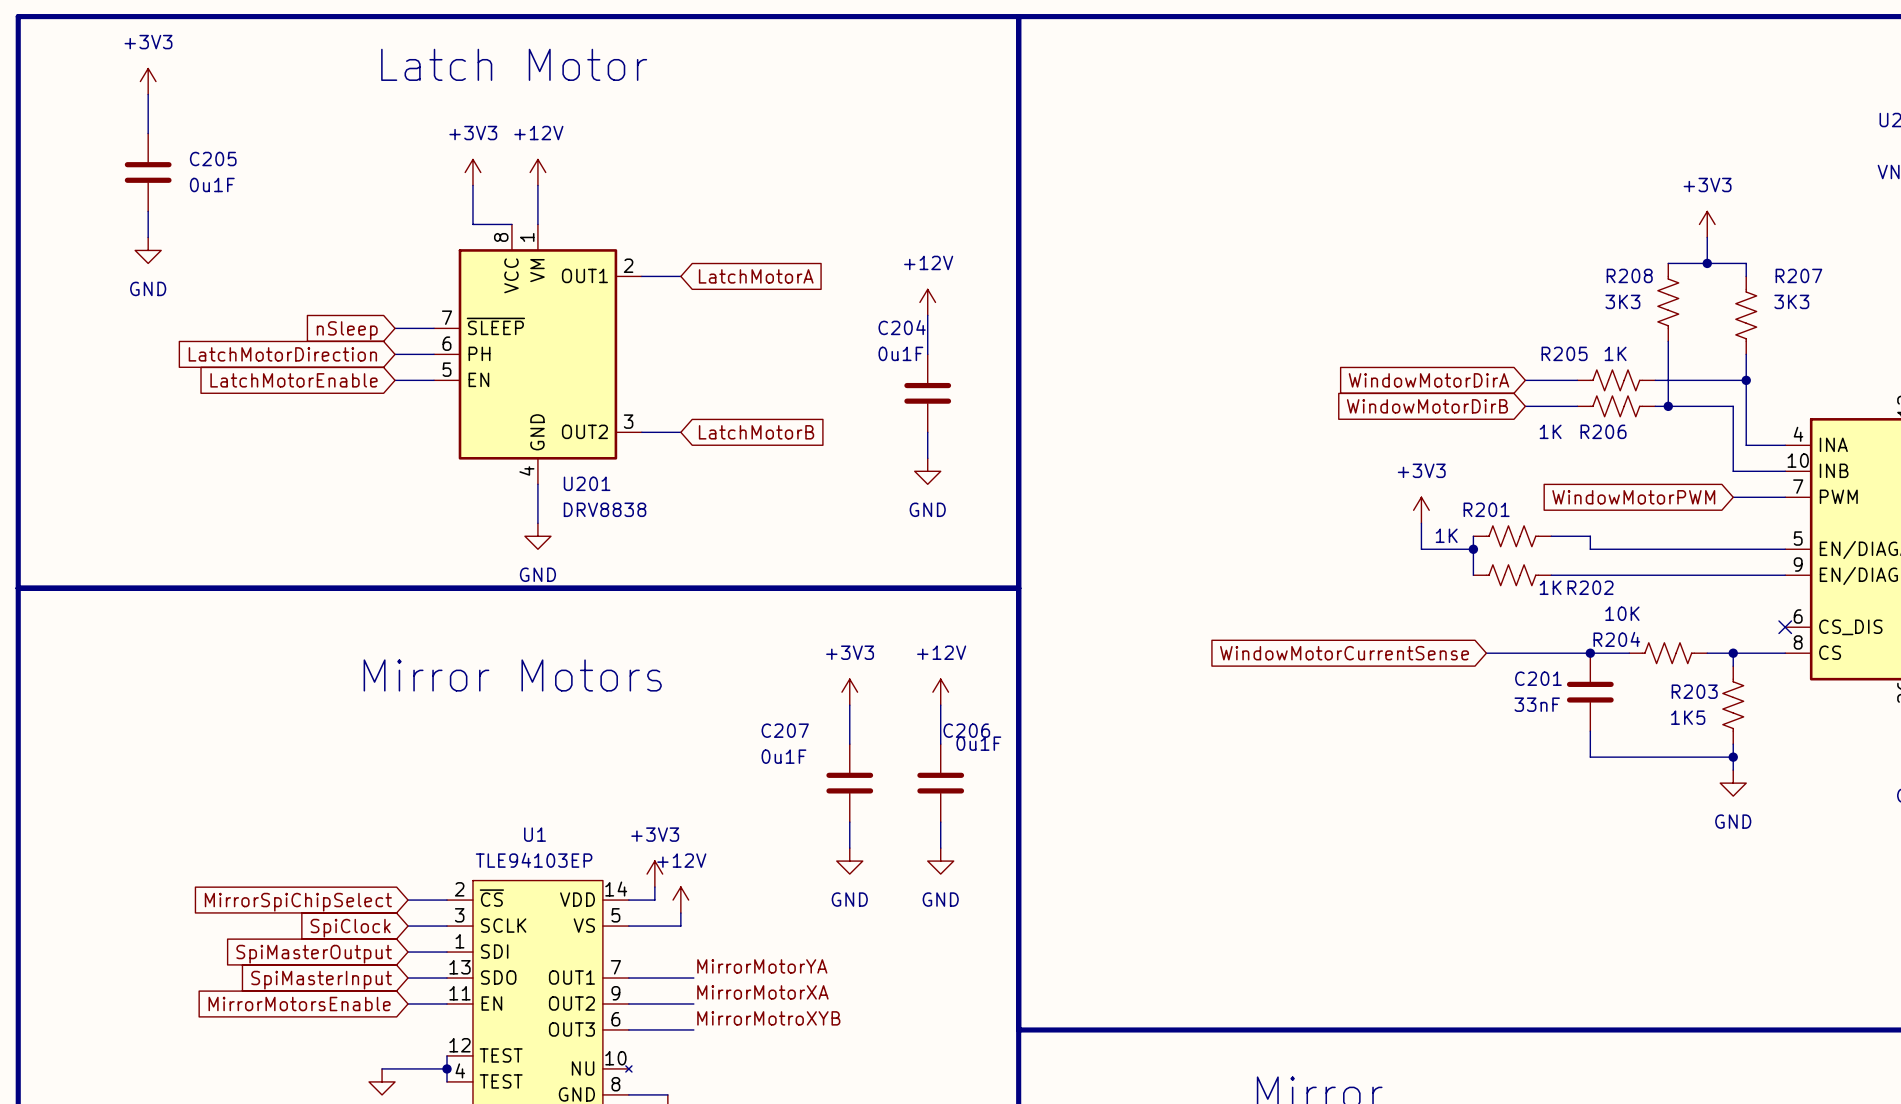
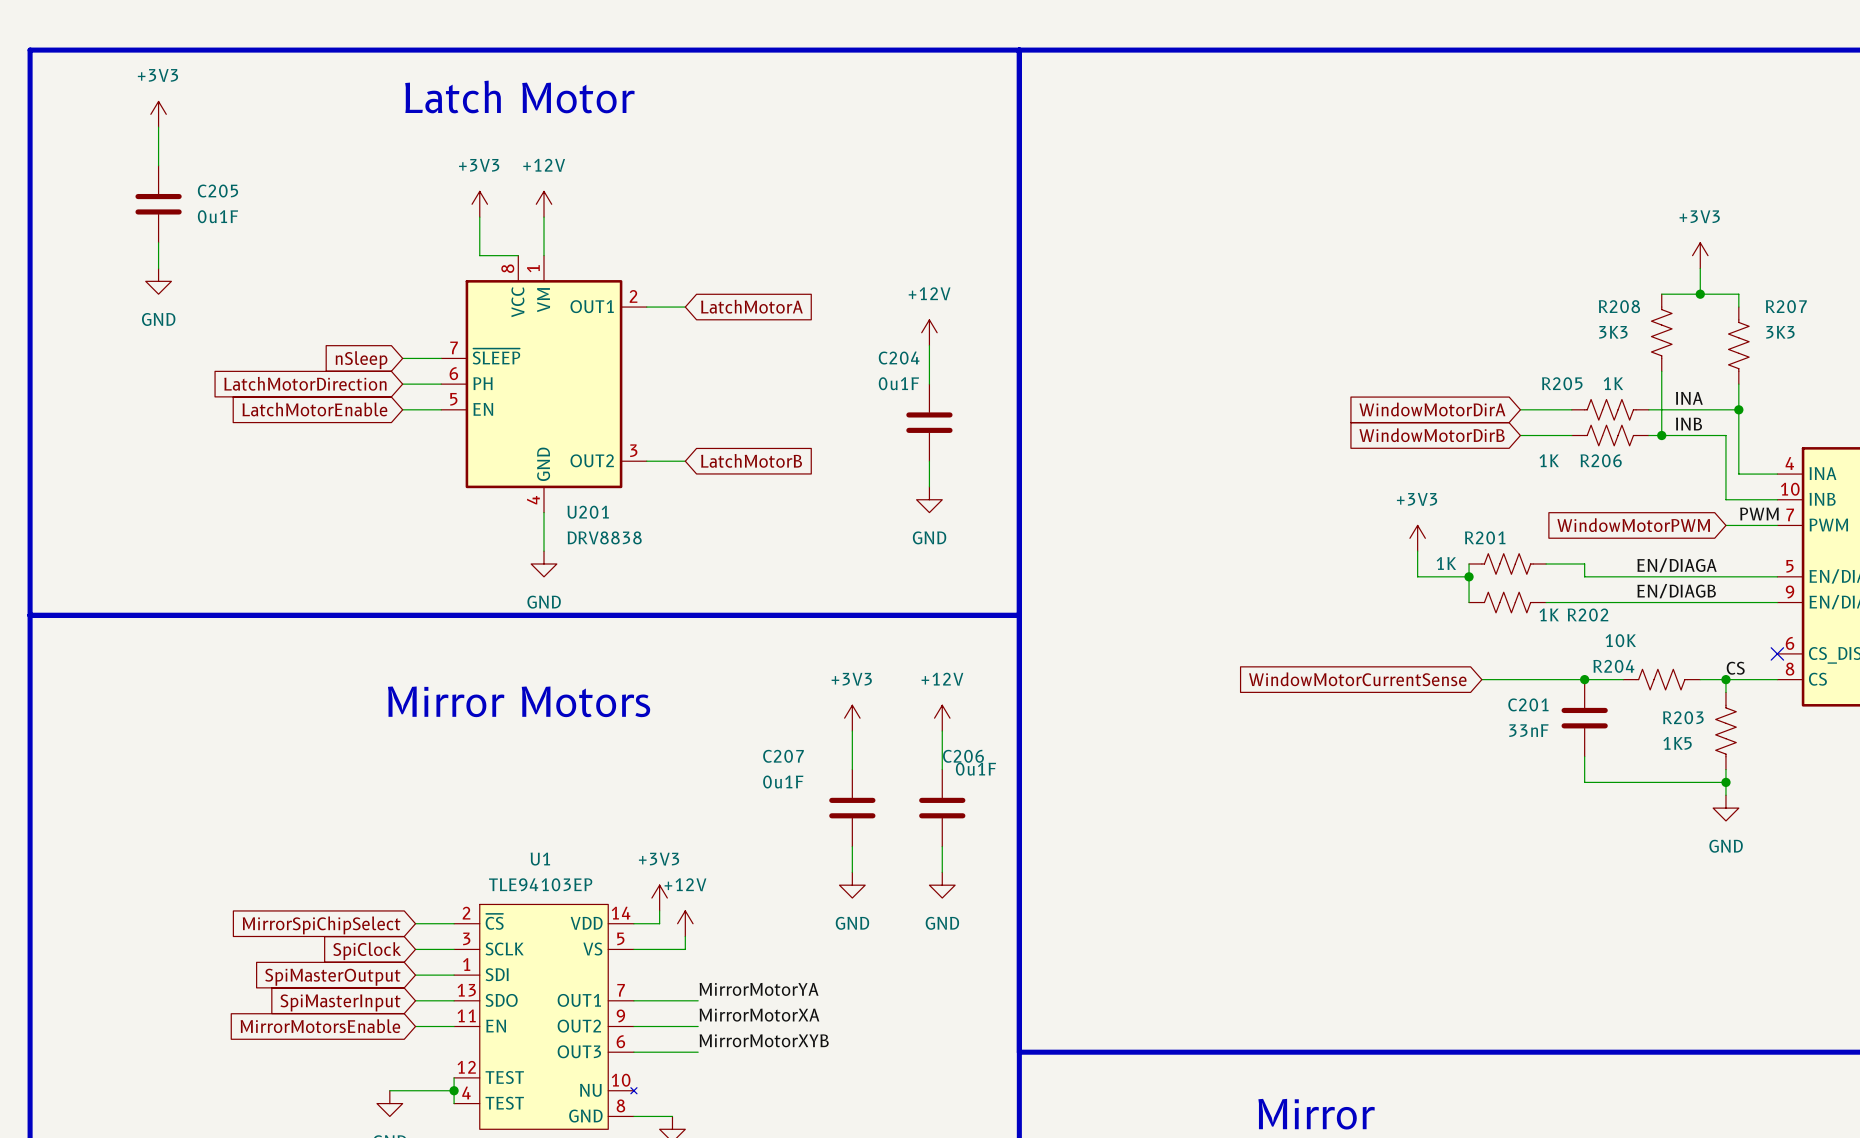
label: none -> INA (1689, 398)
label: none -> INB (1688, 424)
label: none -> PWM (1759, 513)
label: none -> EN/DIAGA (1677, 565)
label: none -> EN/DIAGB (1676, 591)
label: none -> CS (1735, 668)
label: MirrorMotroXYB (768, 1018) -> MirrorMotorXYB (764, 1040)

